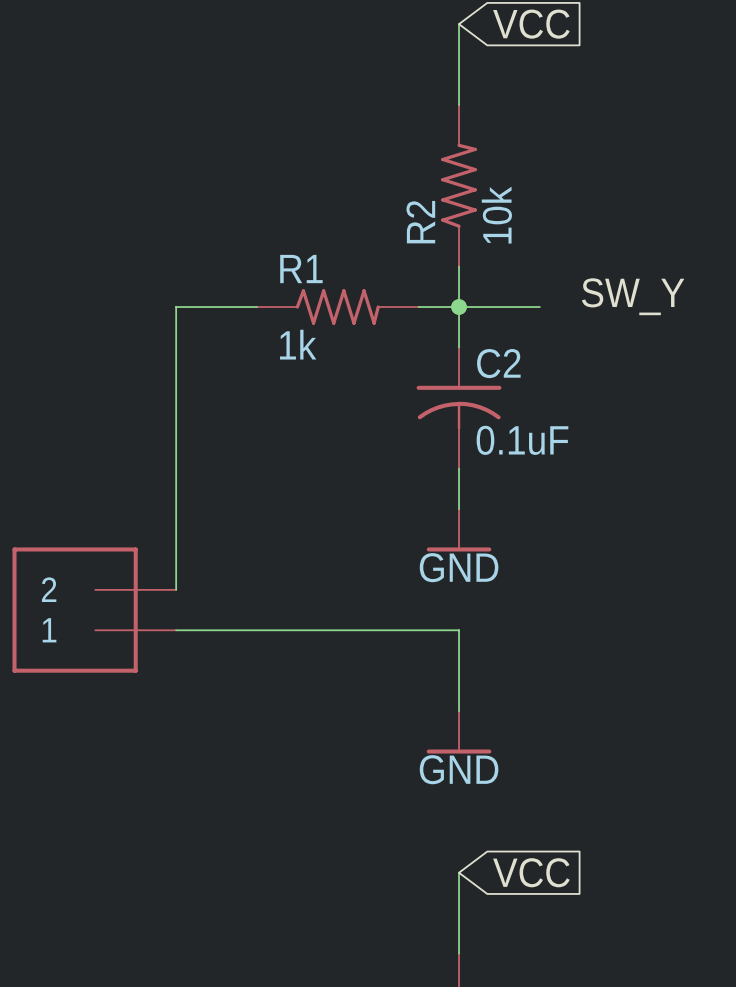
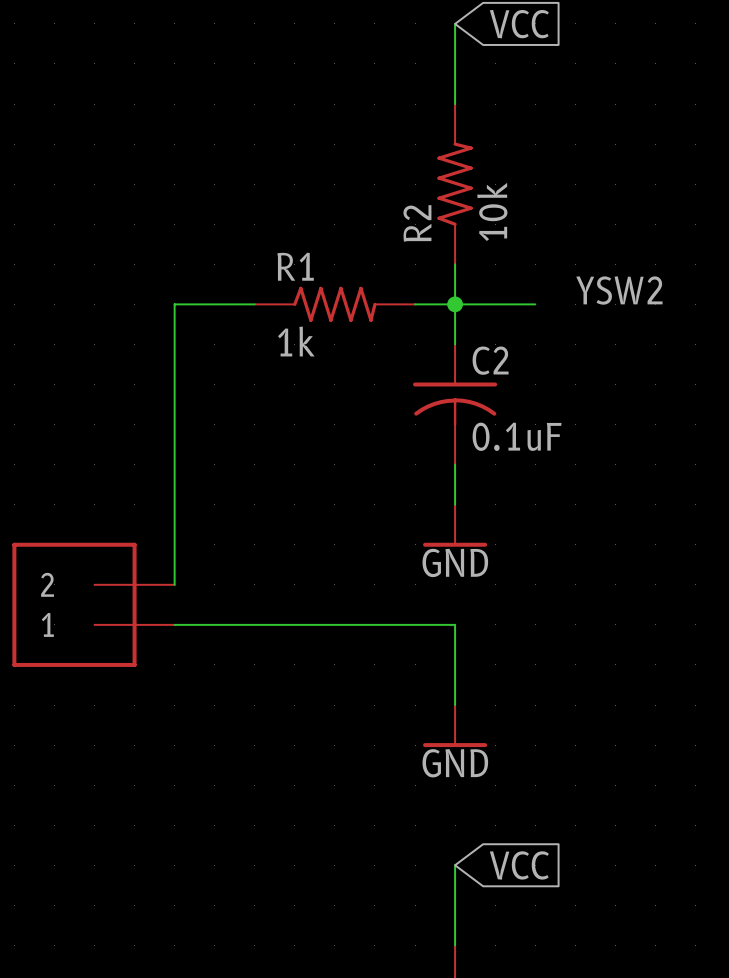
label: SW_Y (633, 296) -> YSW2 (619, 290)

